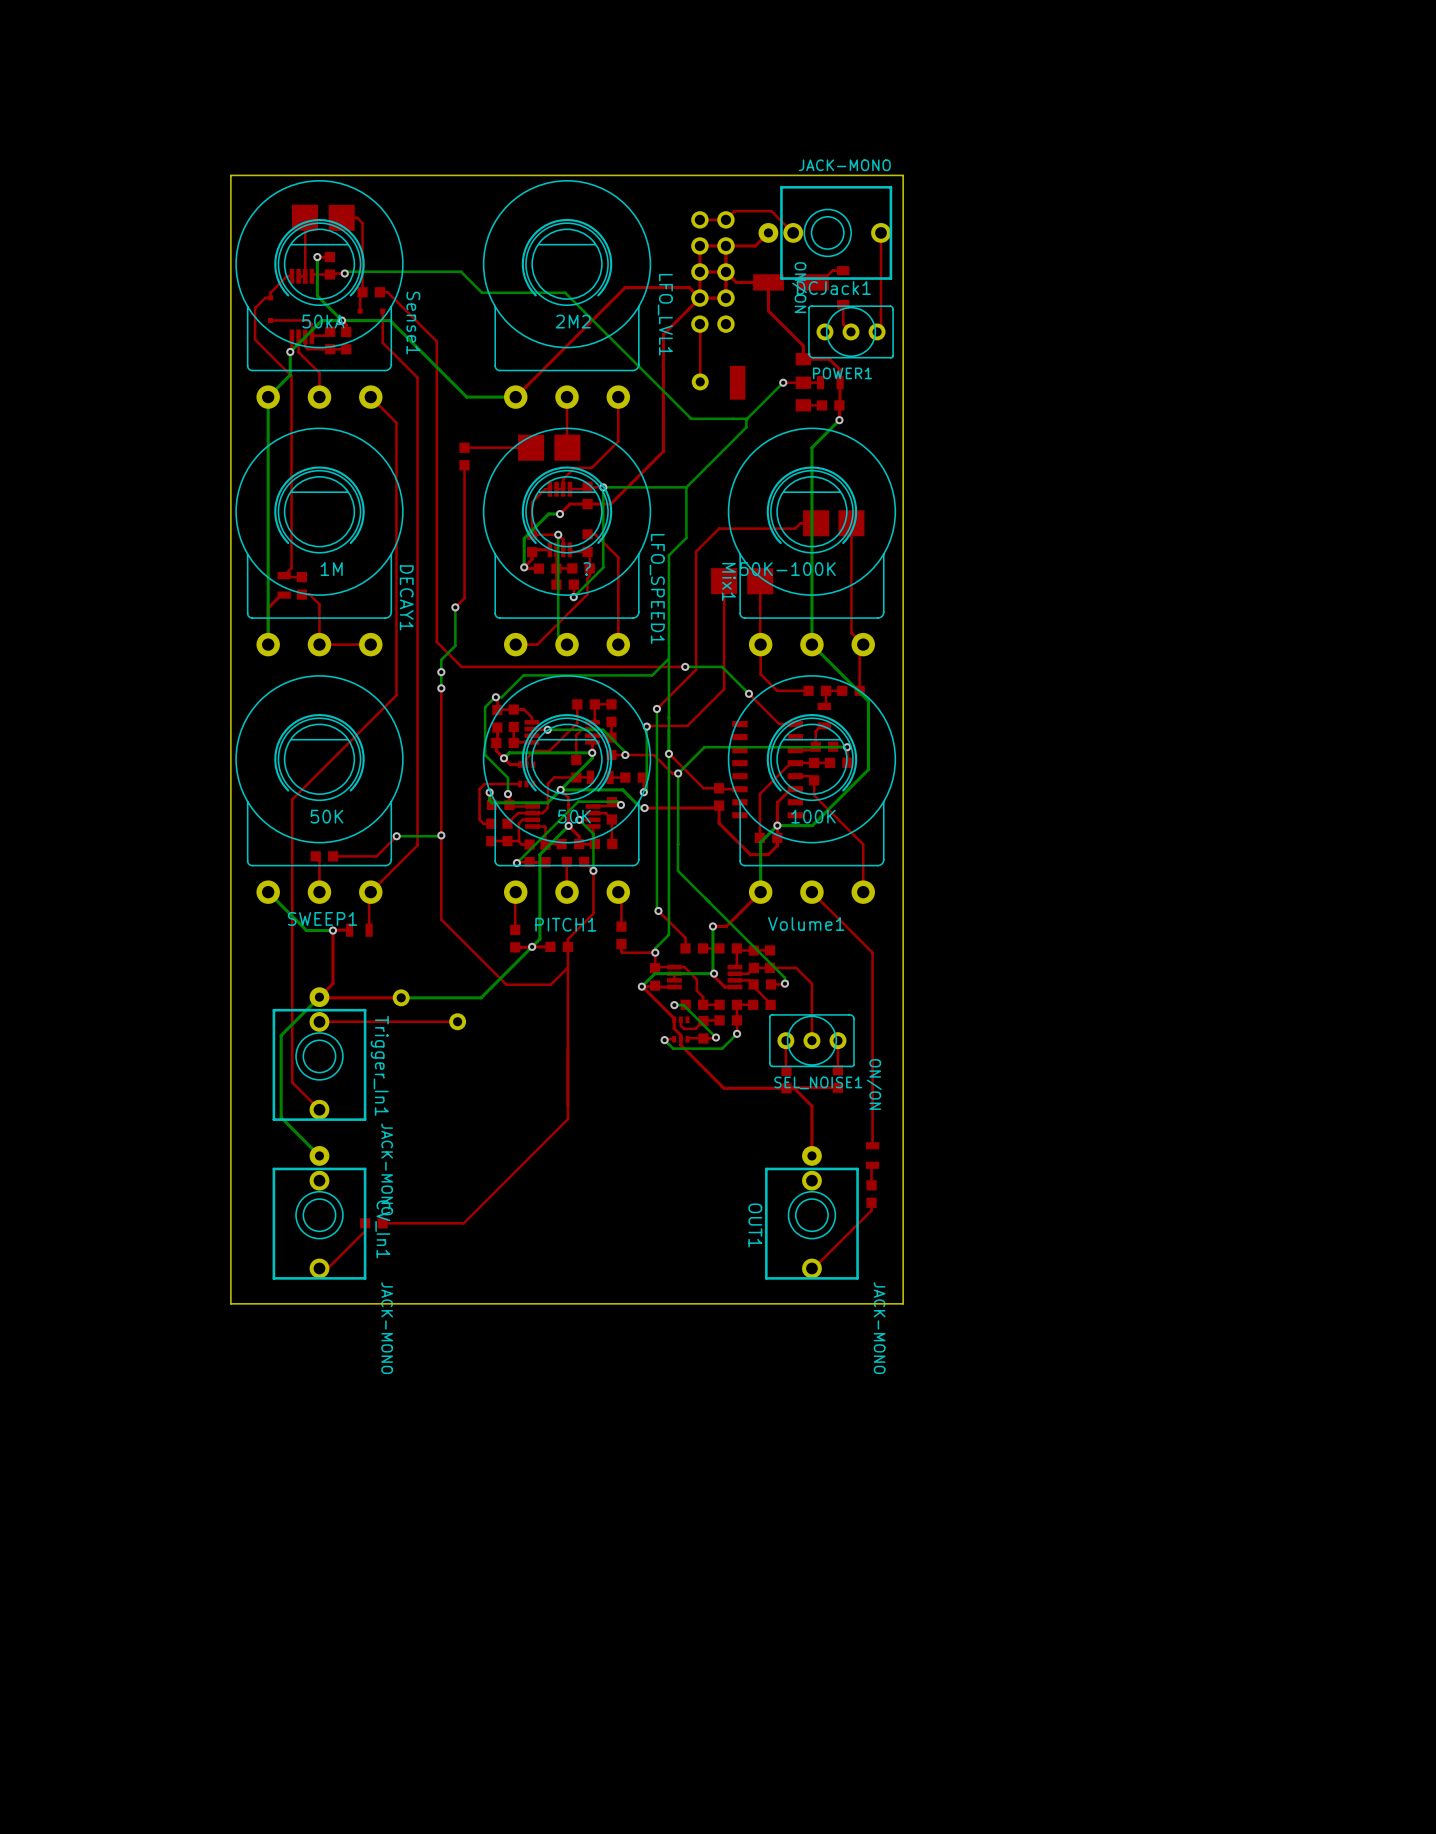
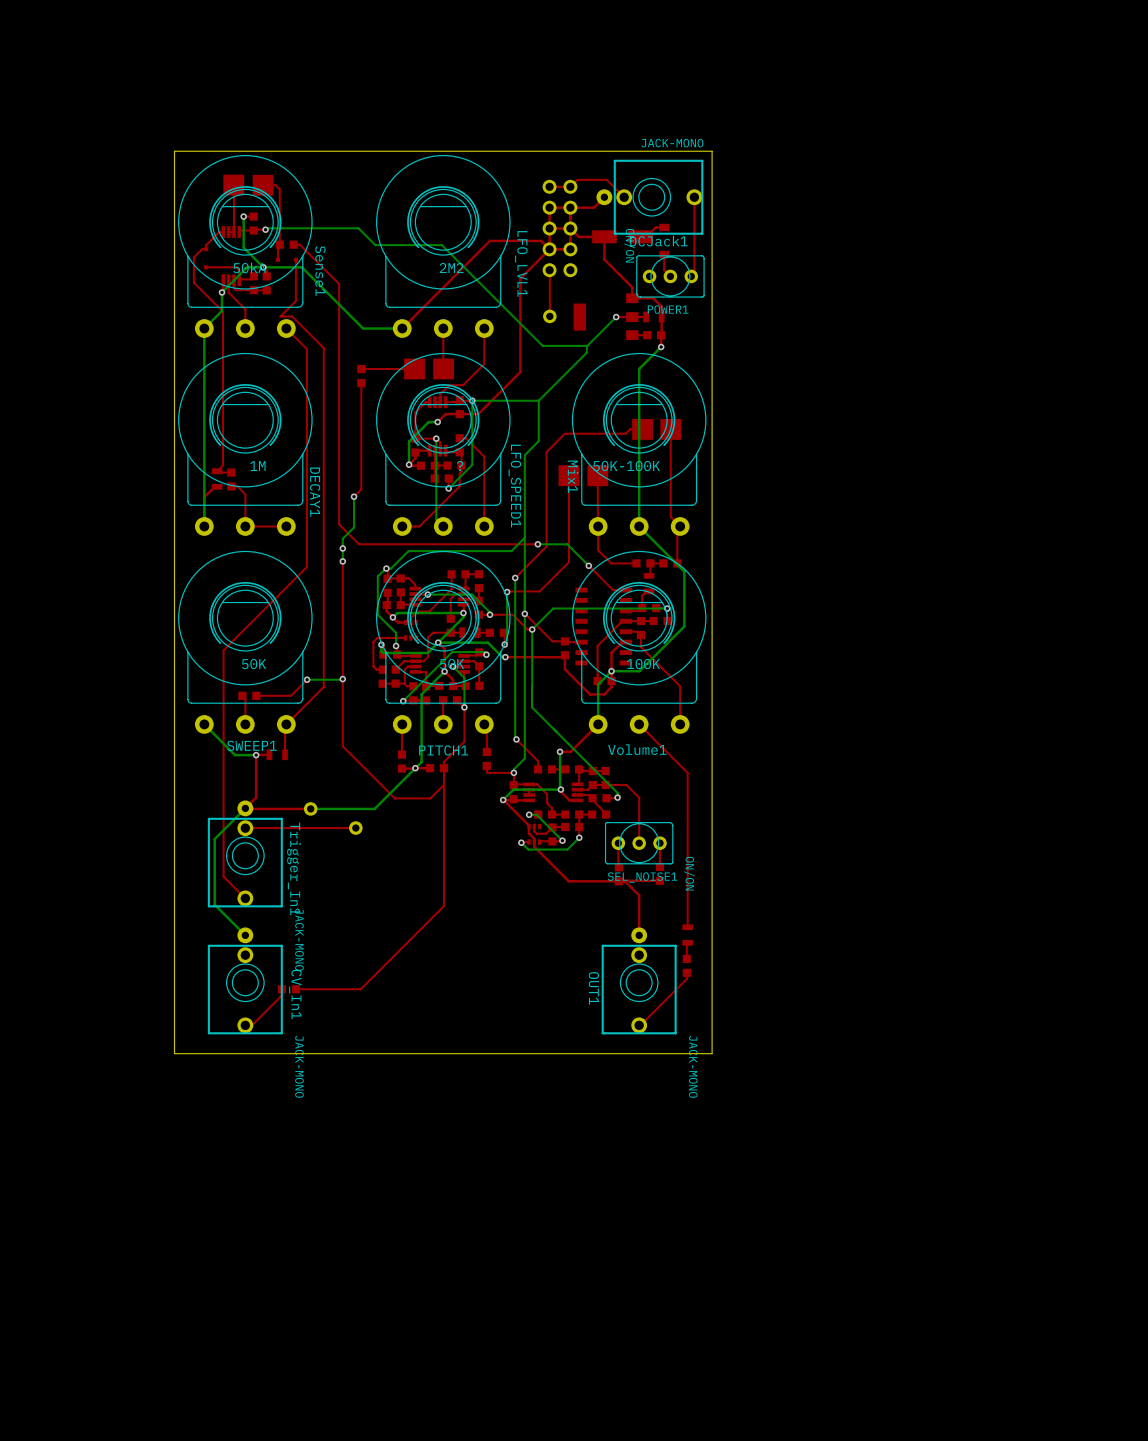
top track: (382, 342) (417, 377) (417, 421) -> (295, 285) (295, 300) (280, 316) (292, 316) (323, 348)

